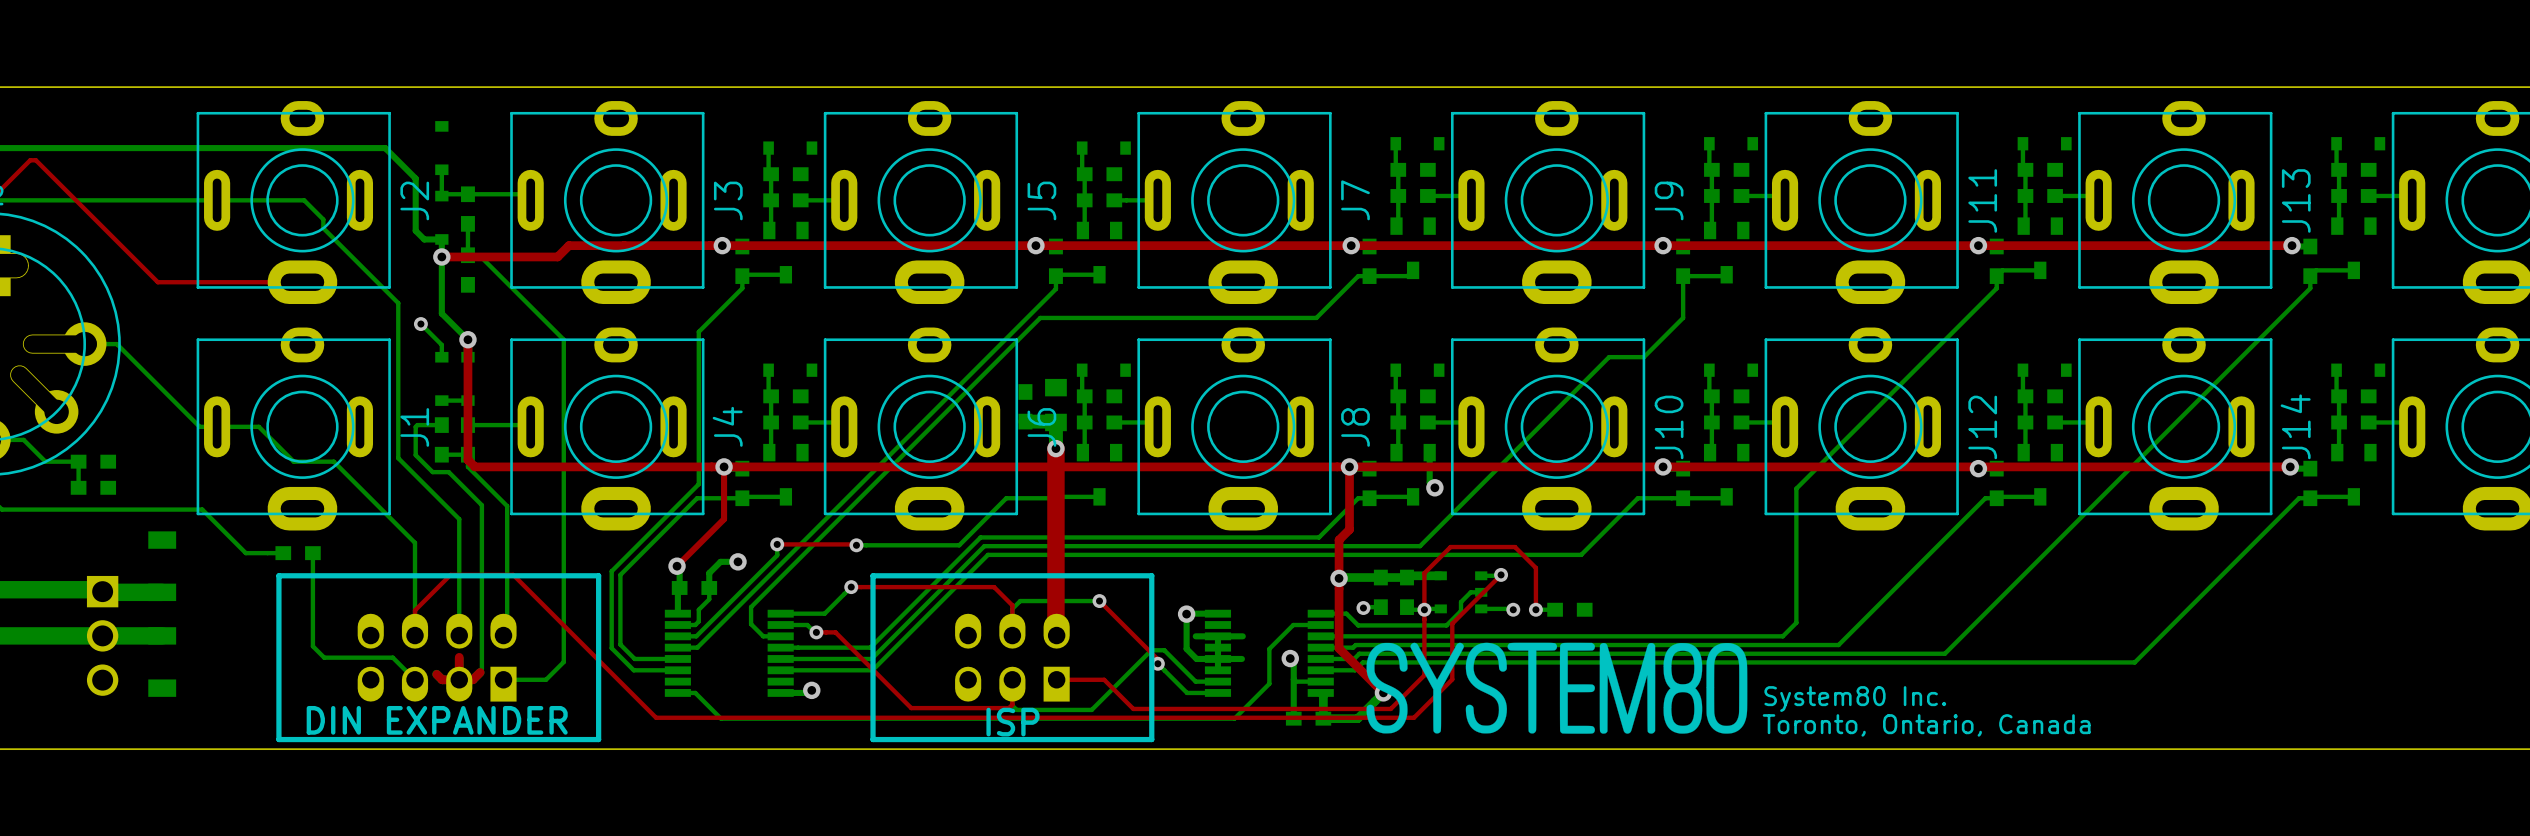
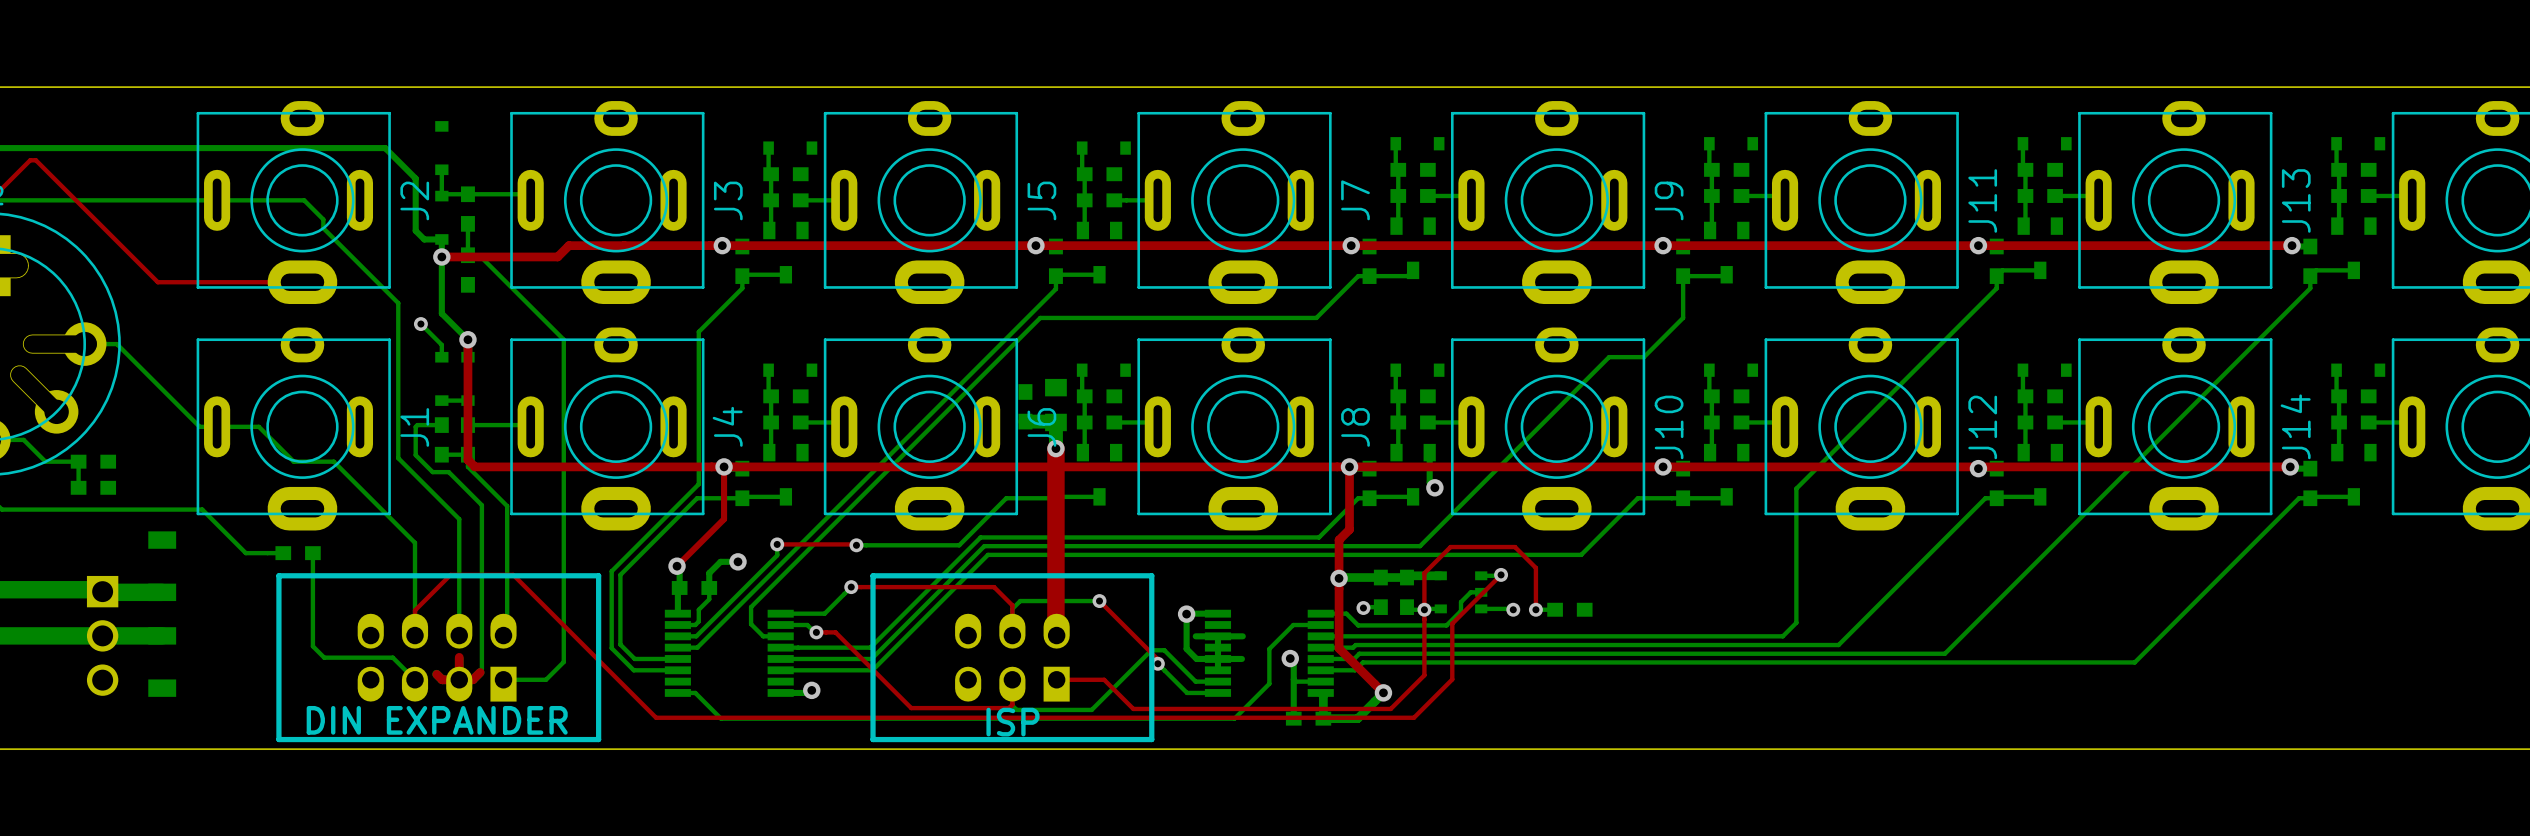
drawing: [1366, 642, 1748, 734] -> none
text: System80 Inc. (1855, 699) -> none
text: Toronto, Ontario, Canada (1926, 725) -> none

